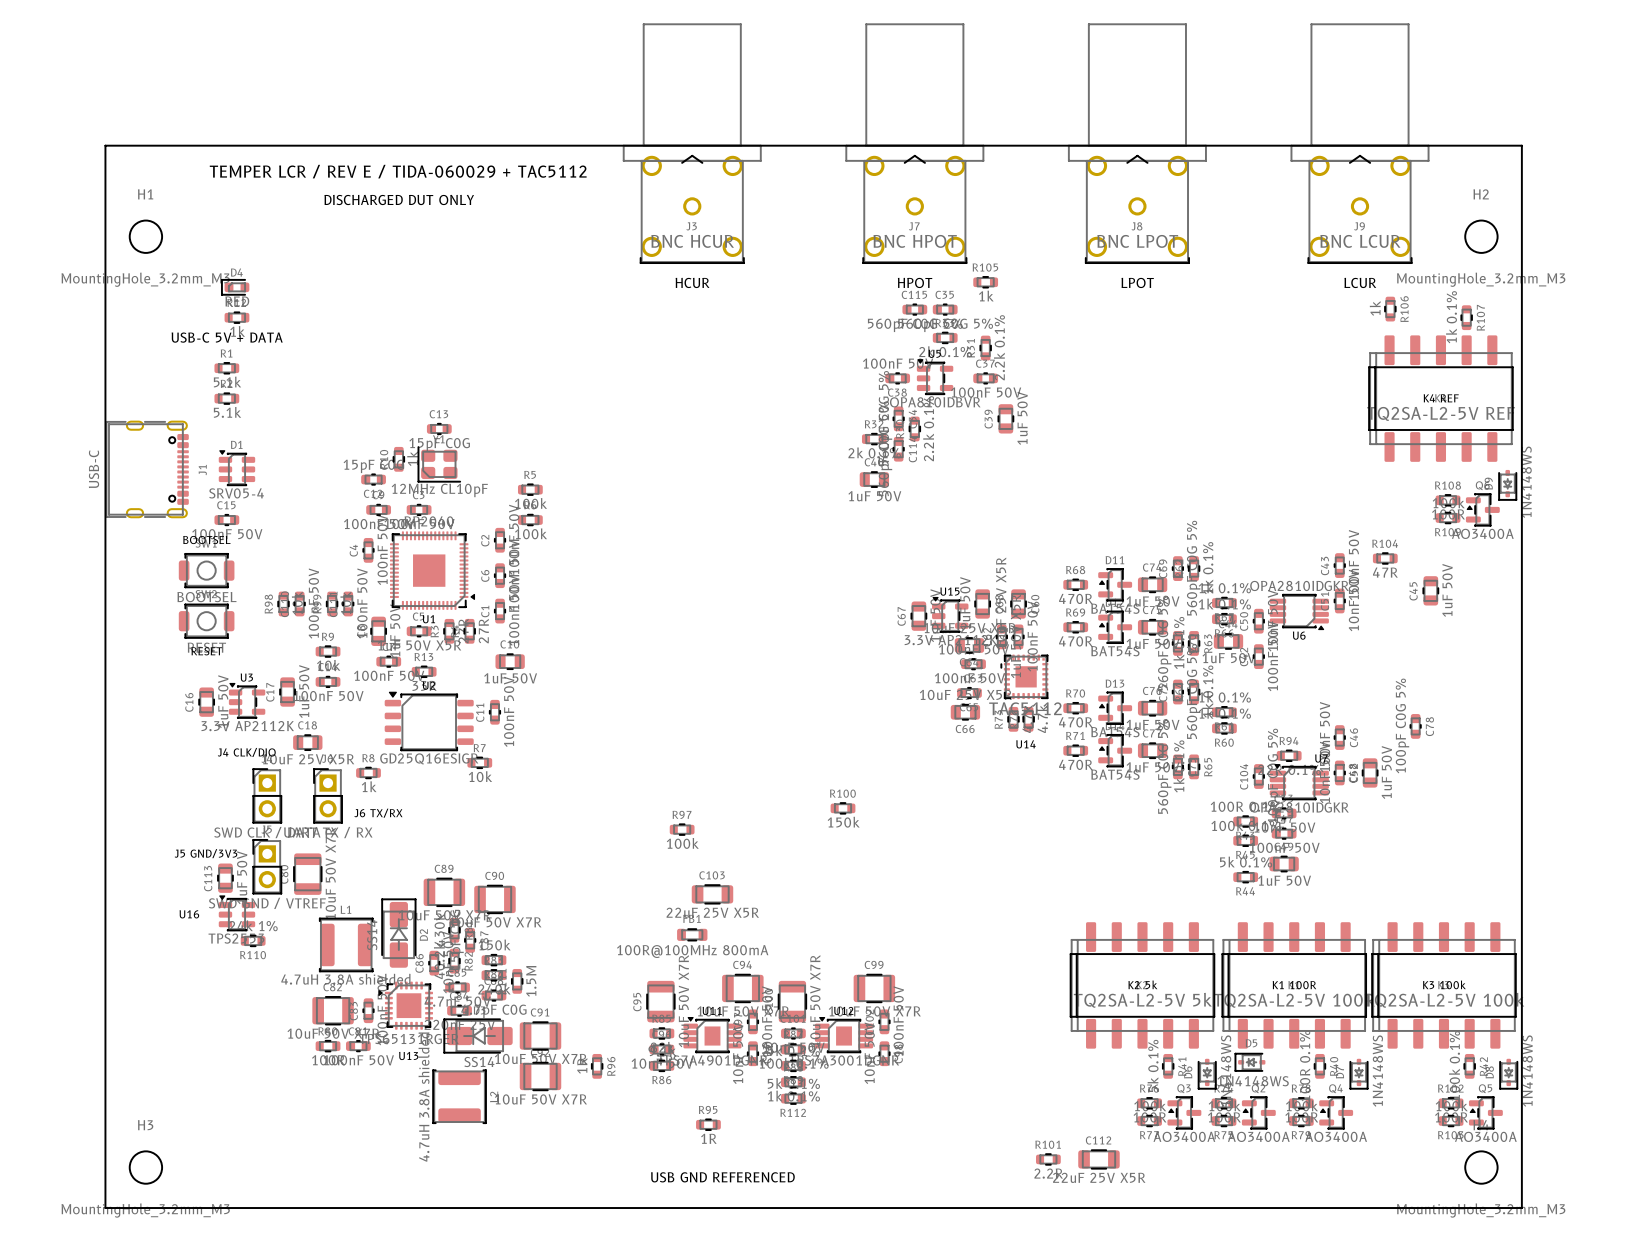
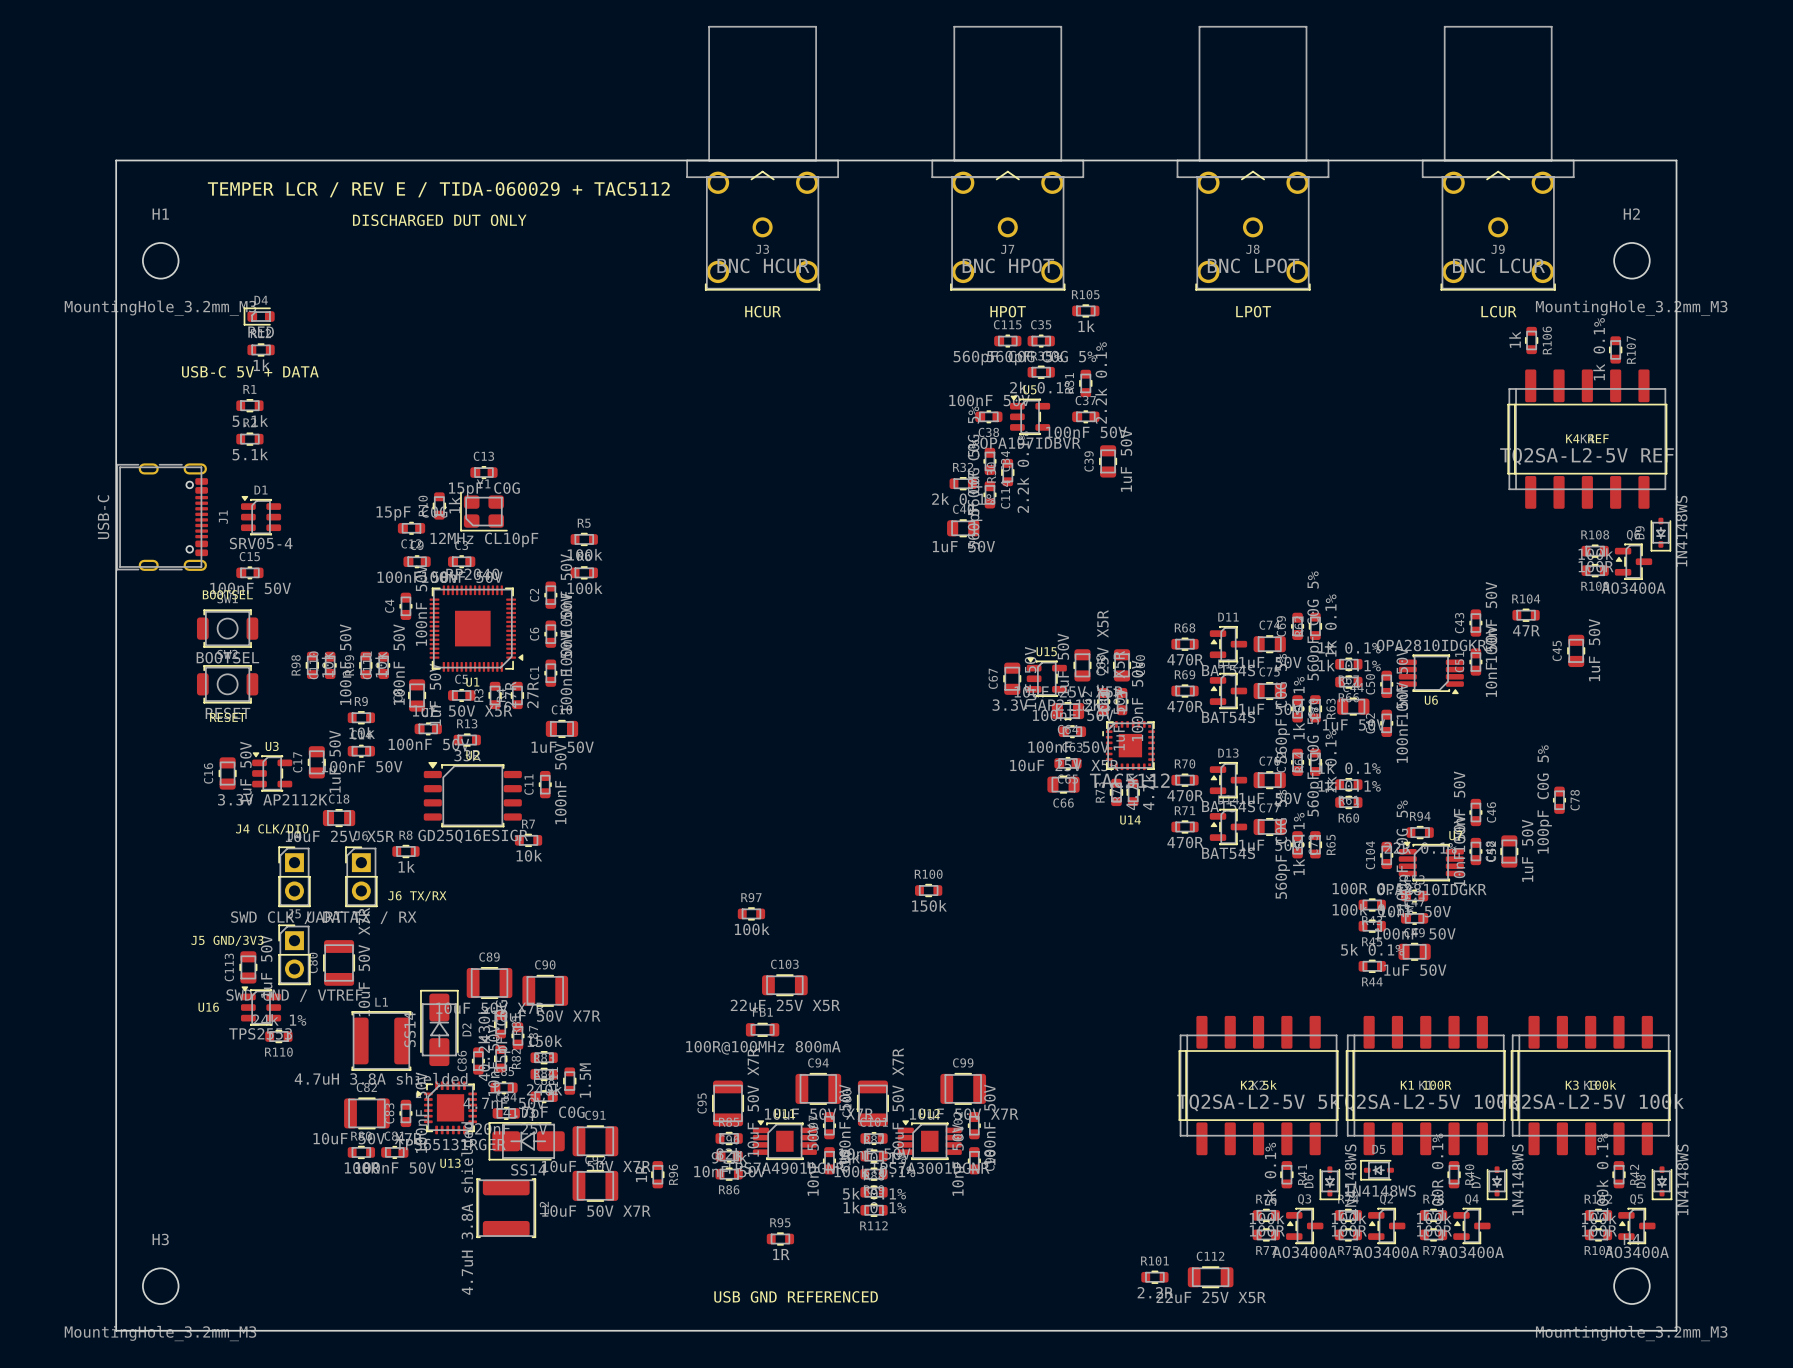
U5 value: OPA810IDBVR (935, 402) -> OPA197IDBVR (1030, 443)

